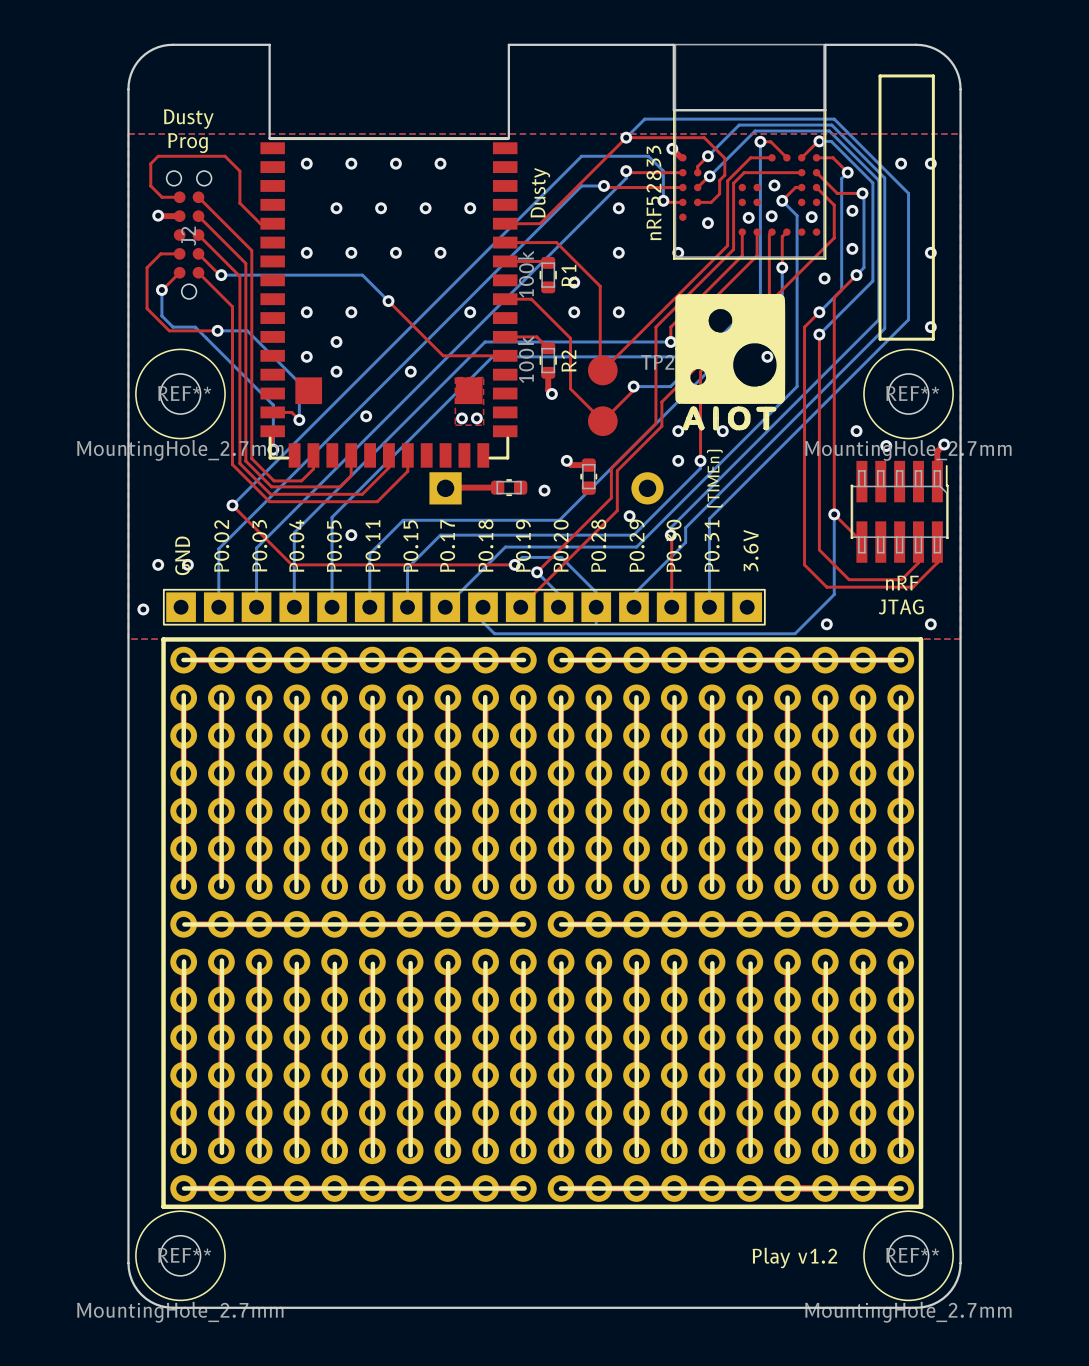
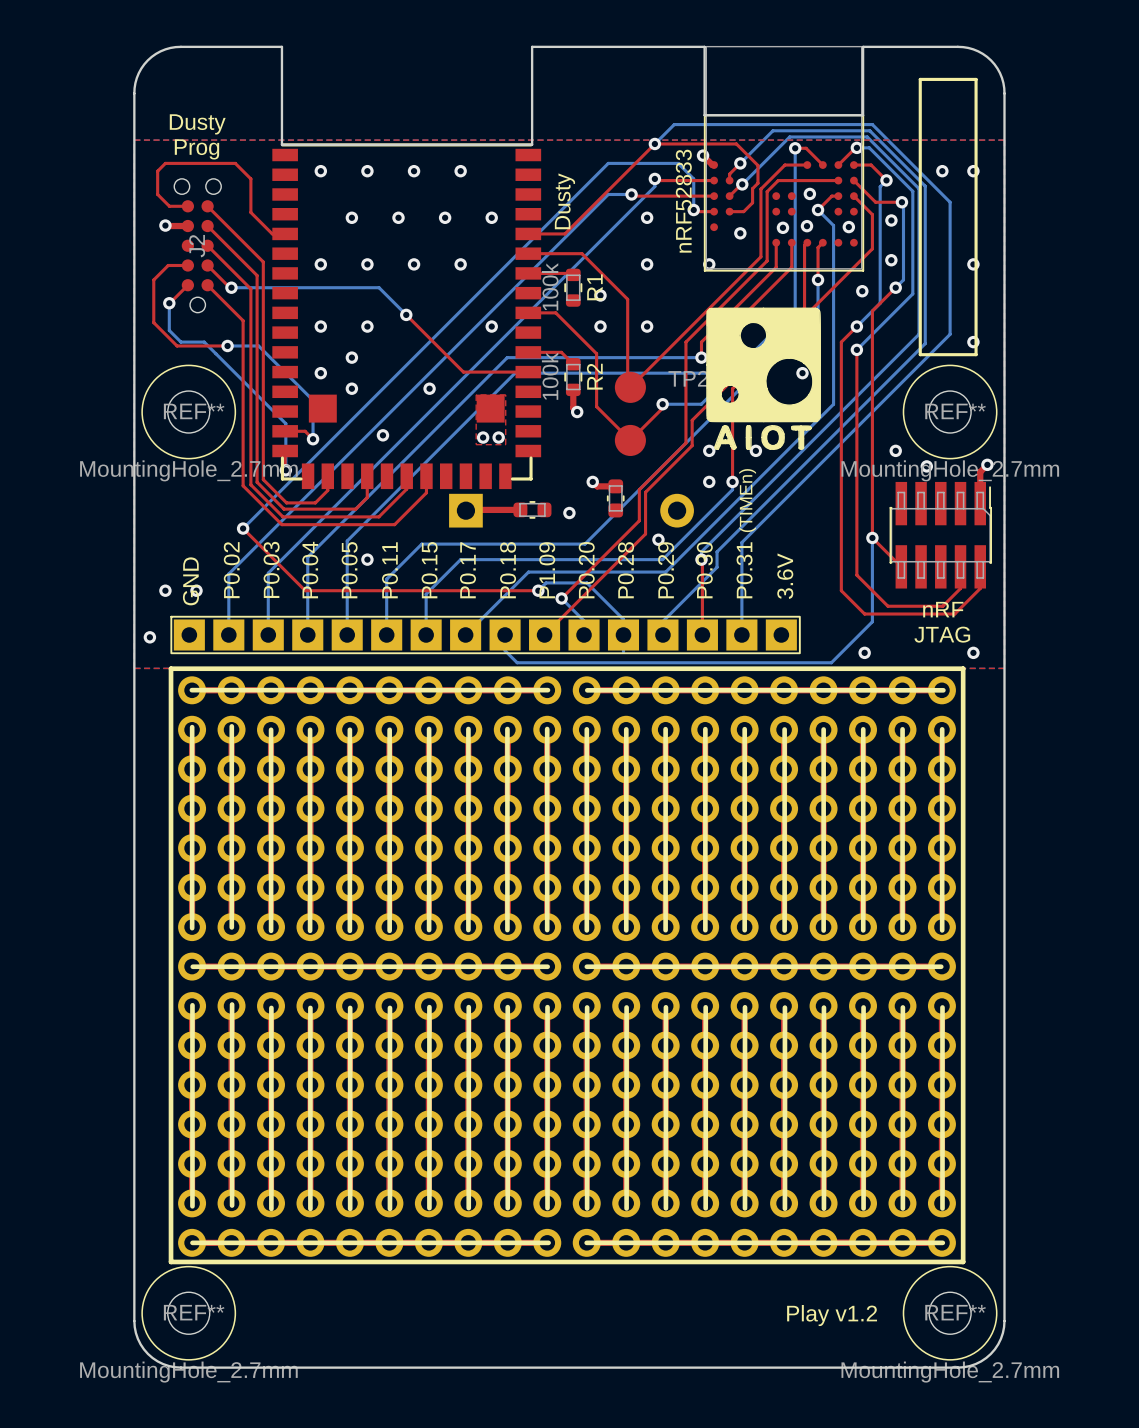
text: P0.19 (523, 545) -> P1.09 (547, 570)

